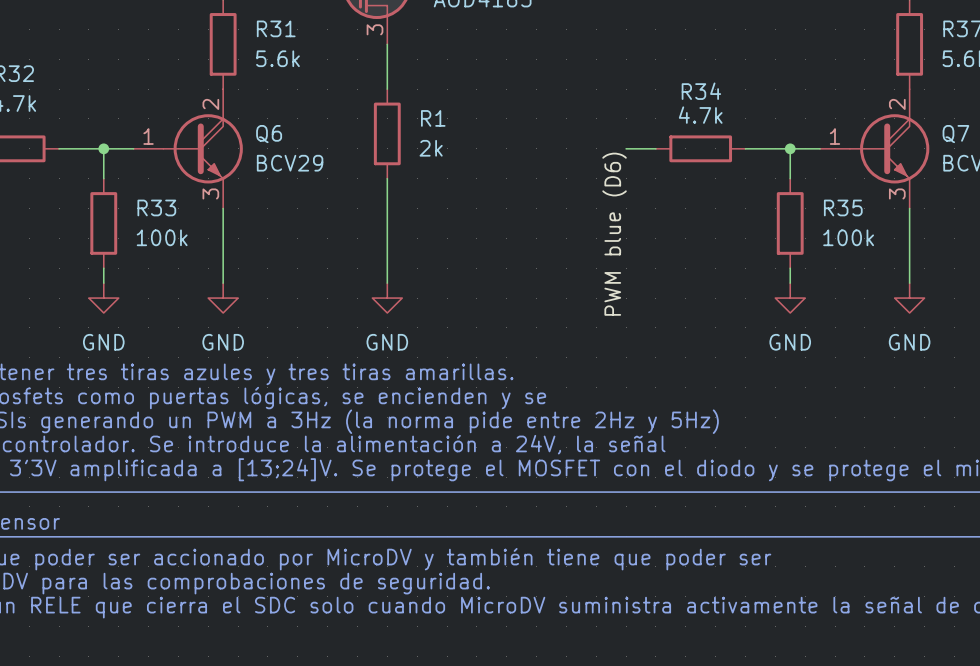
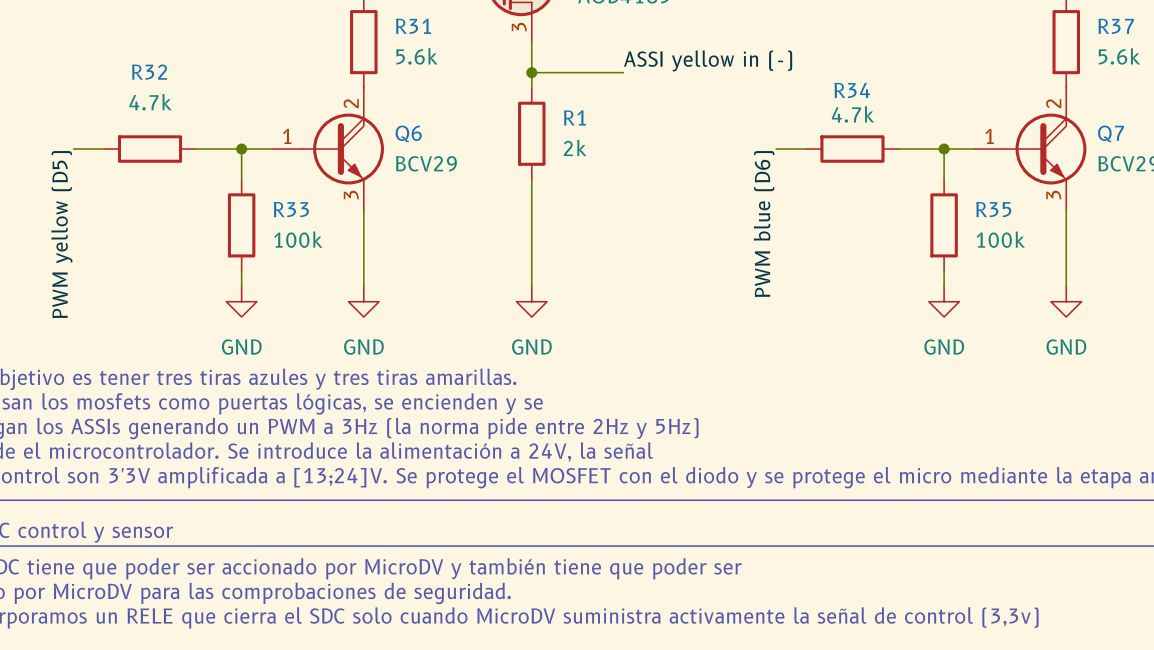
label: none -> ASSI yellow in (-) (708, 60)
wire: none -> (531, 72) (623, 72)
junction: none -> (531, 72)

